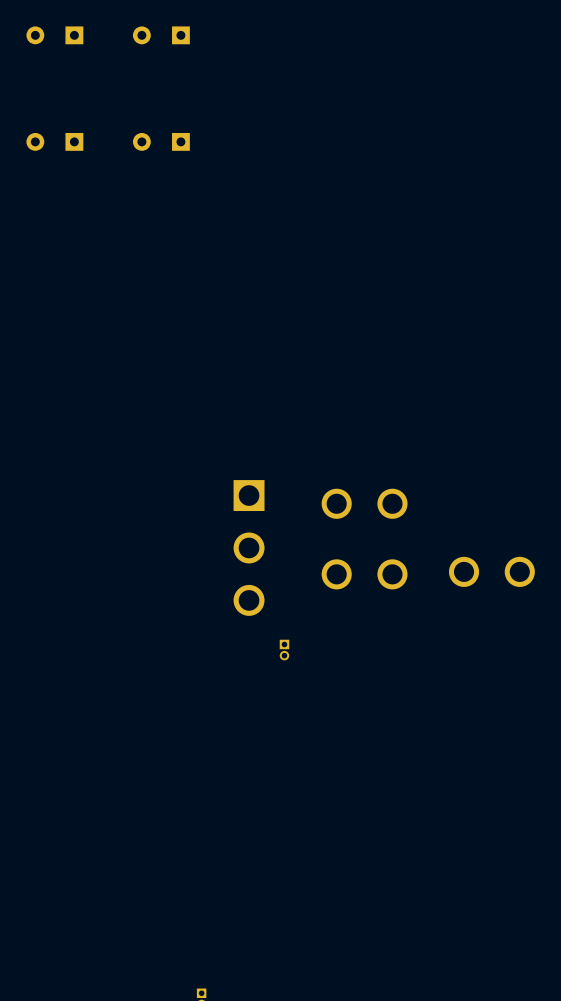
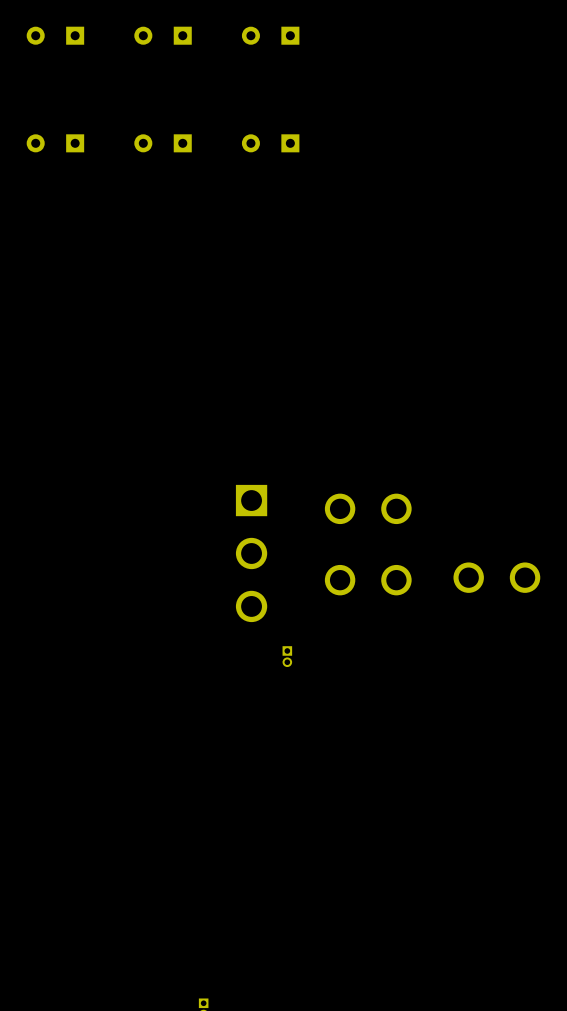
part: none -> (270, 35)
part: none -> (270, 143)

